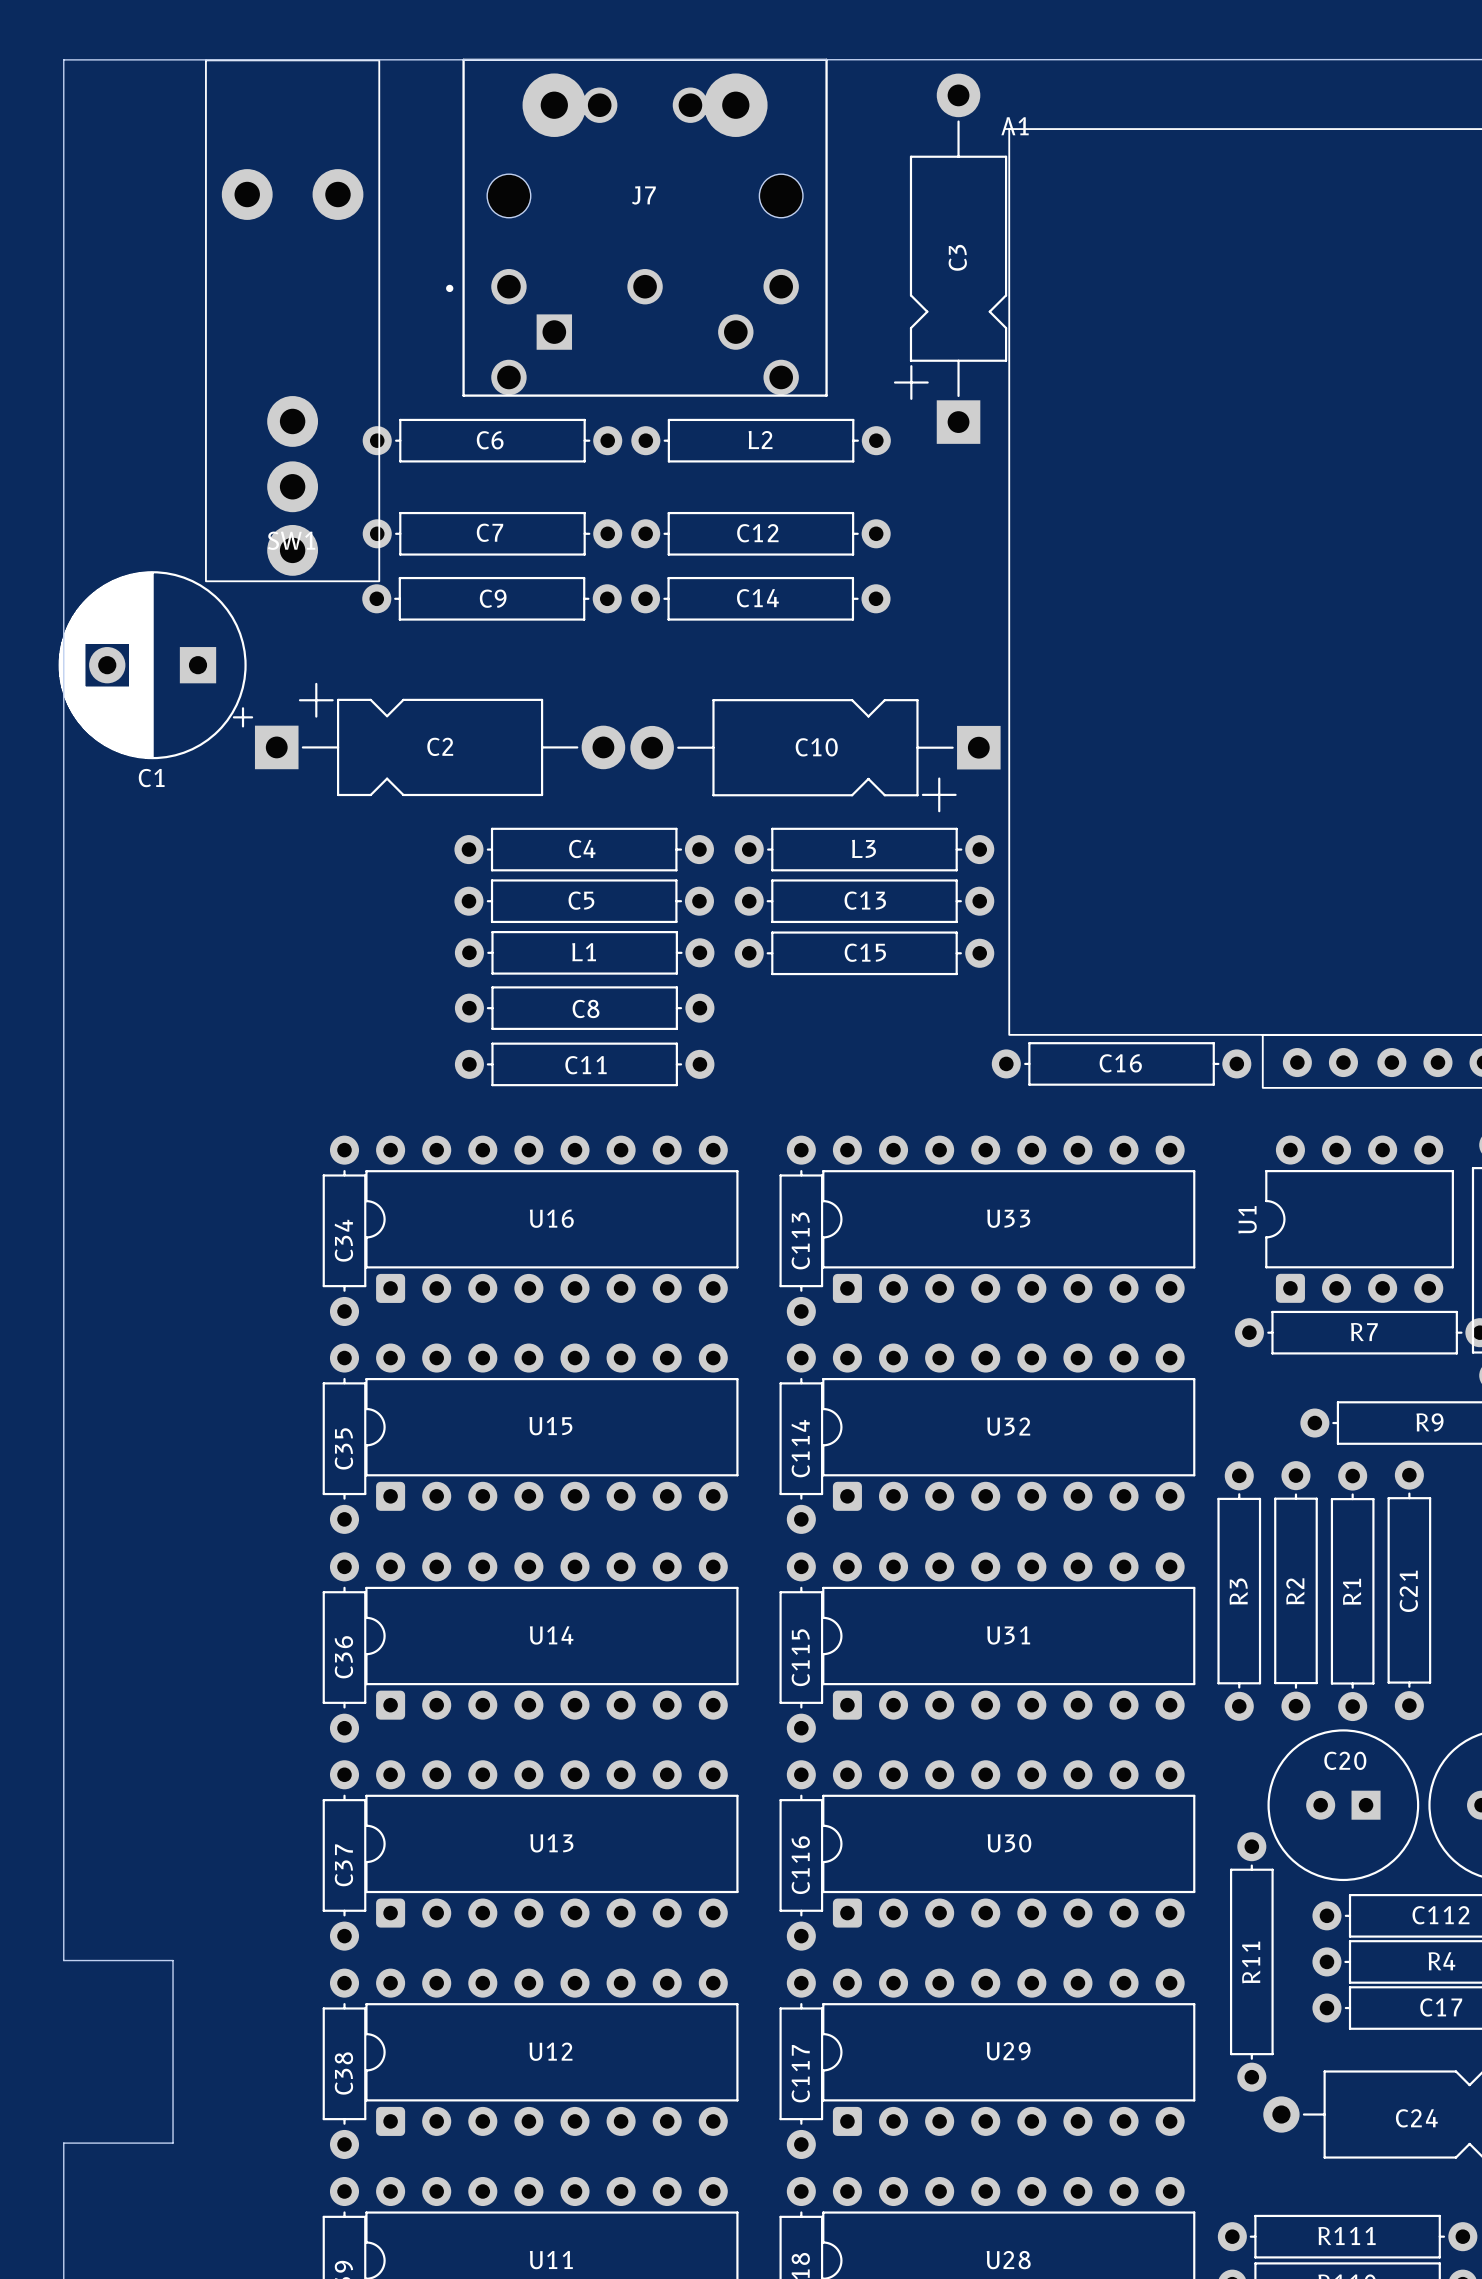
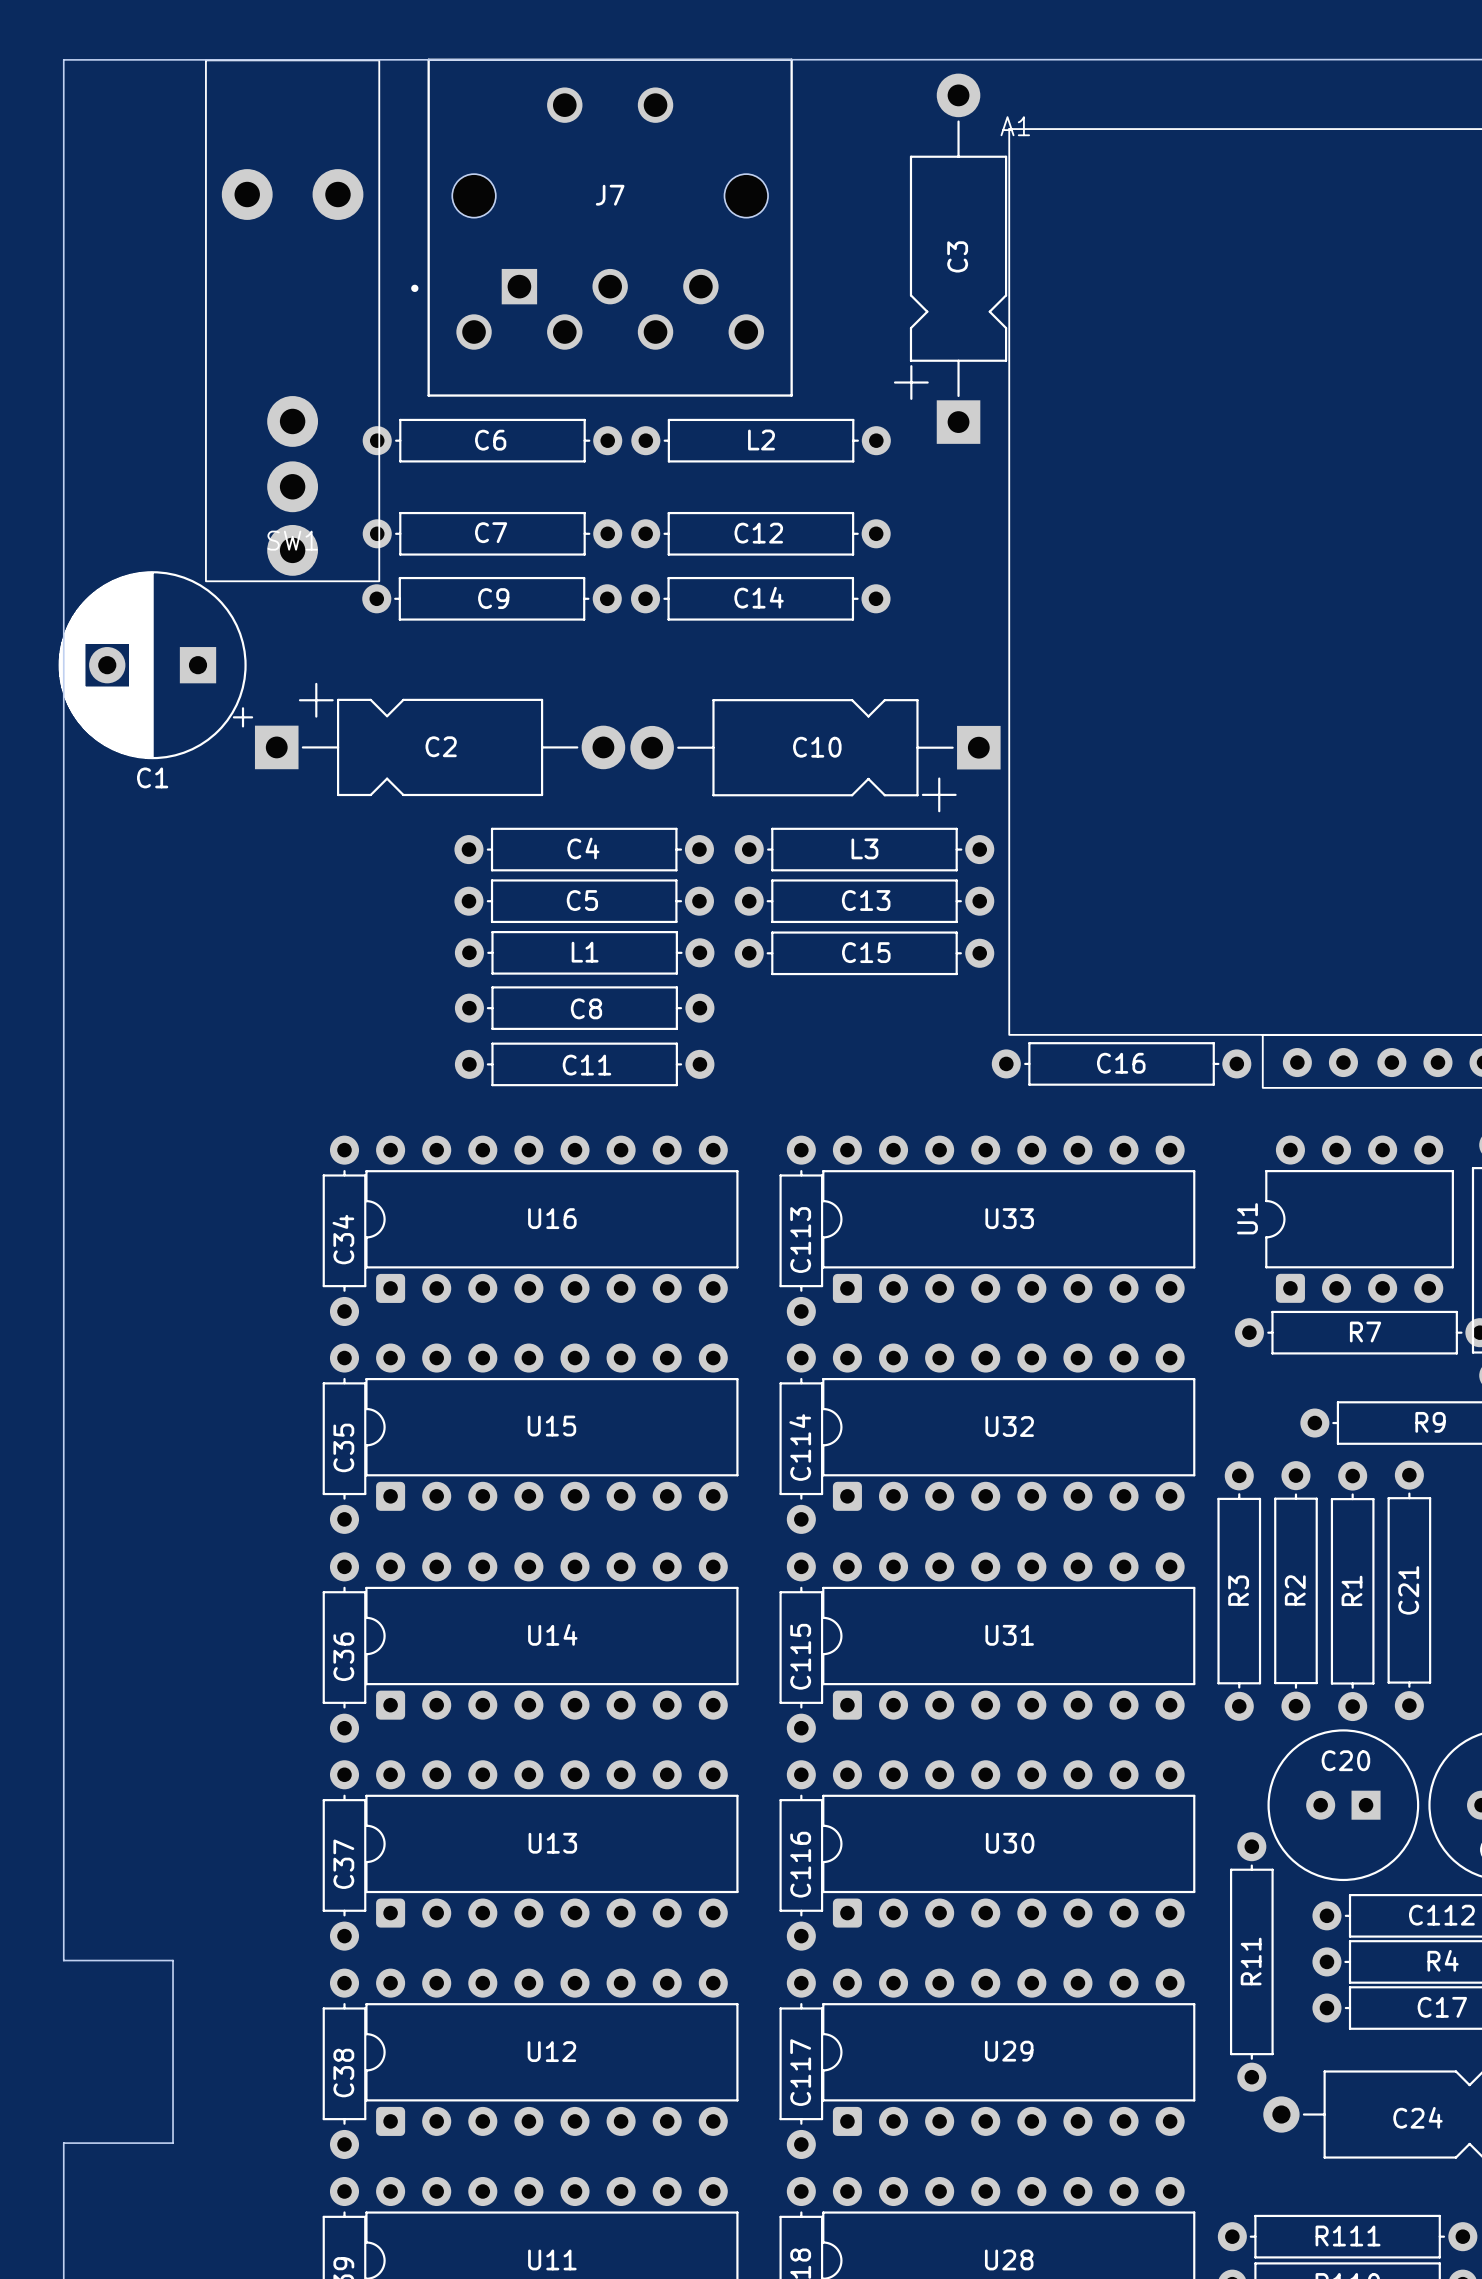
J7 footprint: [446, 58, 828, 397] -> [411, 58, 793, 397]

